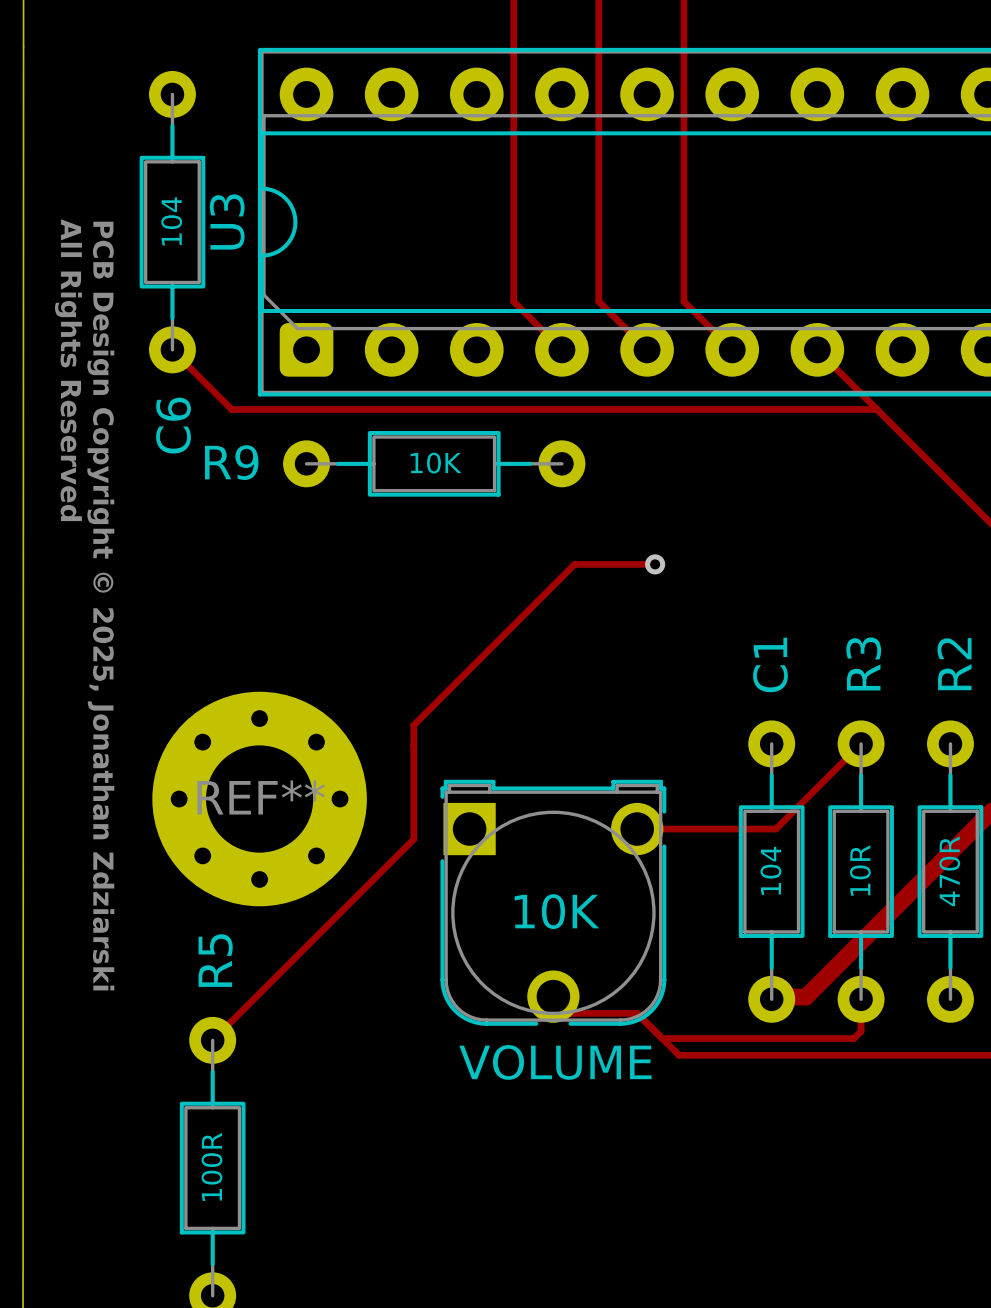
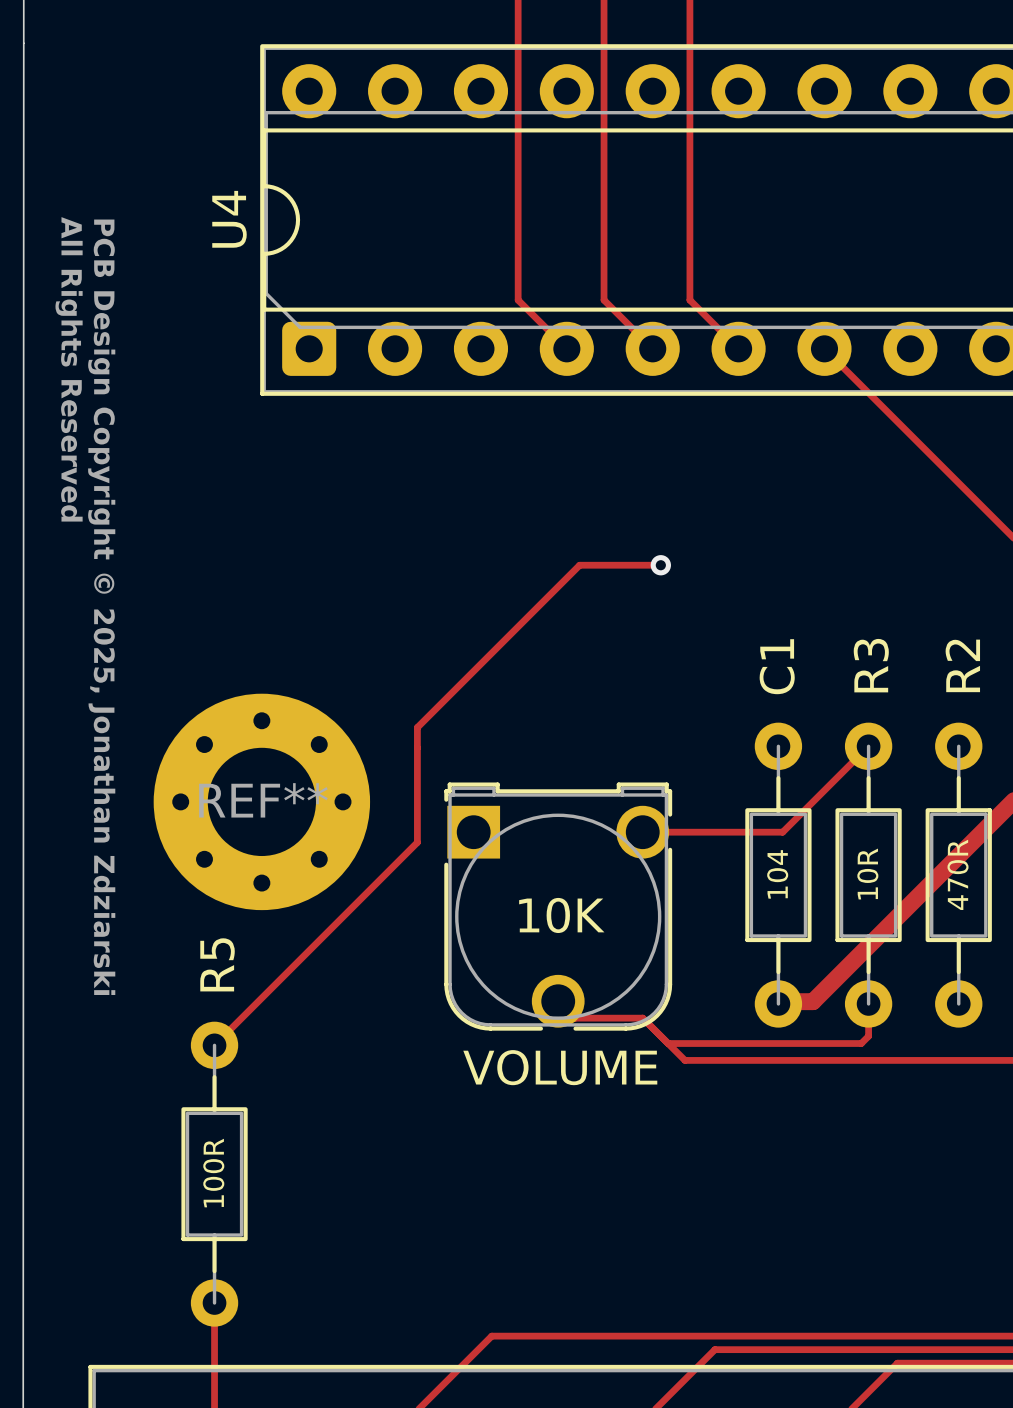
C6: 104 (172, 222) -> none
U3 name: U3 (227, 222) -> U4 (229, 219)
track: (172, 350) (231, 409) (877, 409) -> none
R9: 10K (434, 463) -> none

